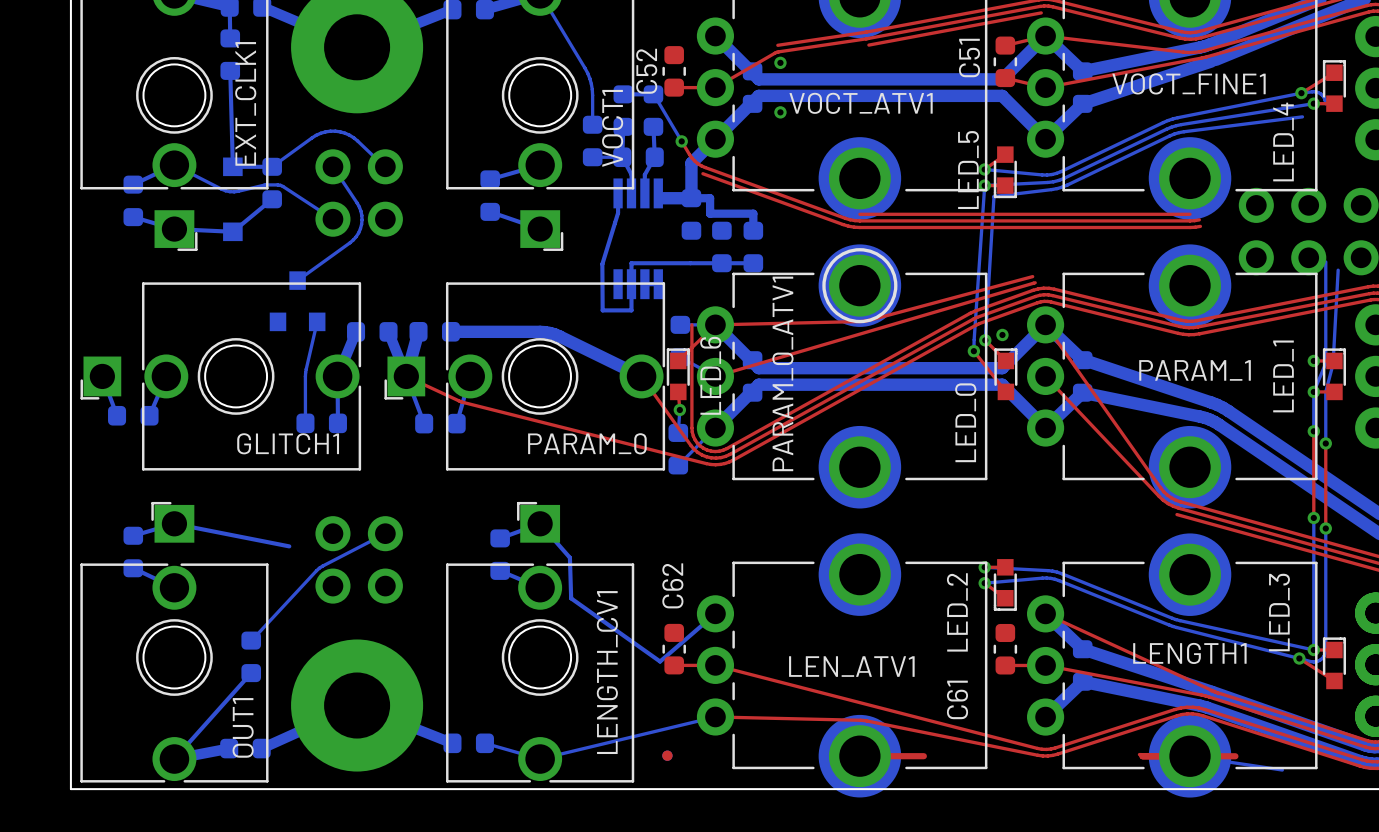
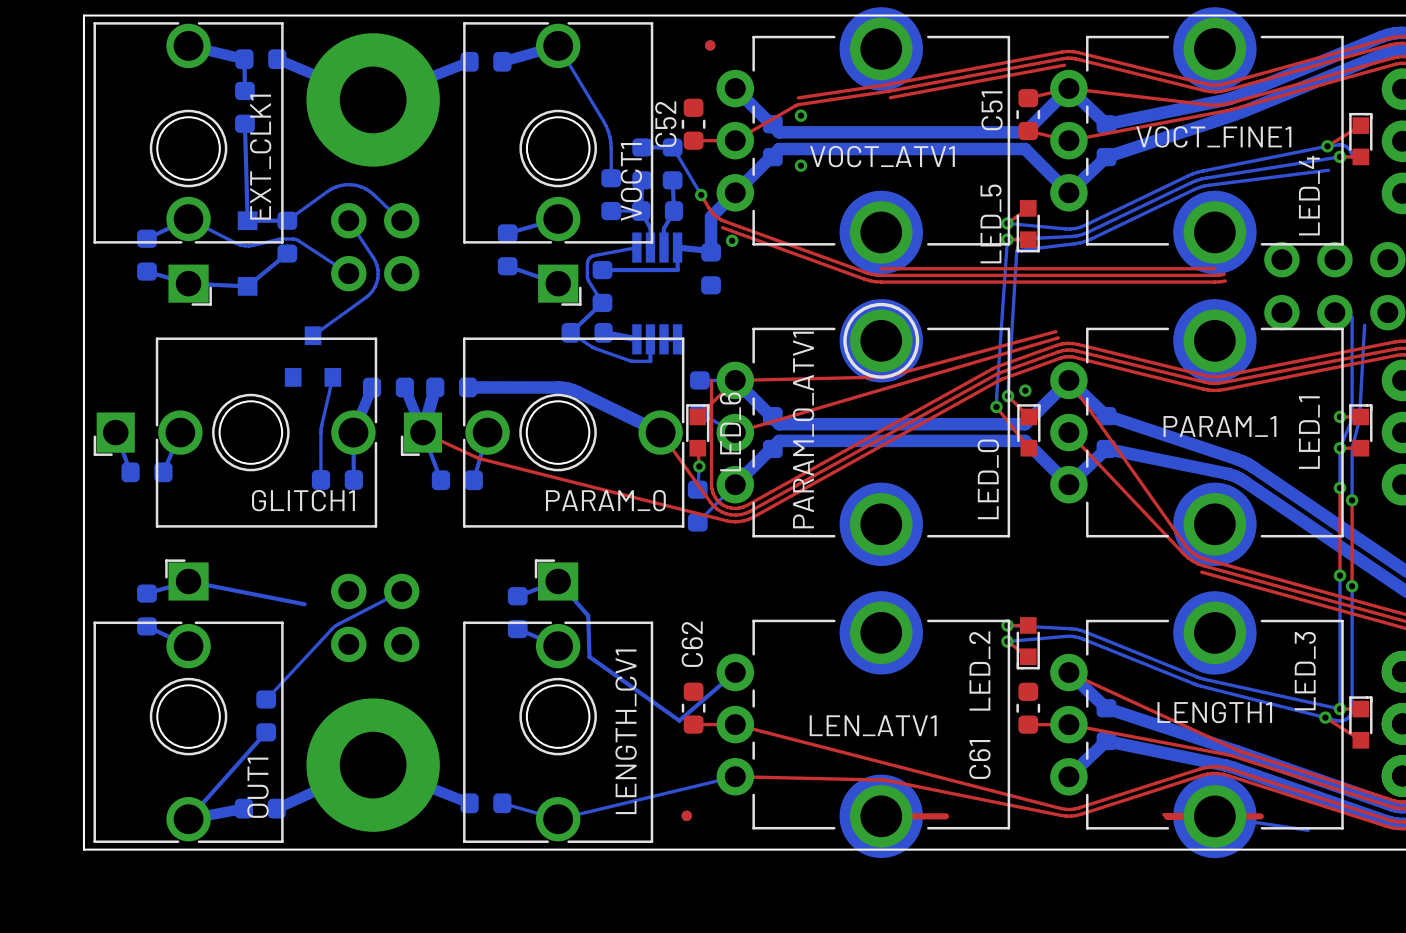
via: none -> (732, 240)
bottom track: (618, 193) (618, 213) (602, 264) (602, 310) (631, 310) (631, 305) -> (636, 247) (594, 255) (588, 259) (587, 278) (602, 302) (570, 332) (594, 348) (630, 360) (650, 361)
bottom track: none -> (711, 251) (677, 247) (677, 270) (602, 270)
bottom track: (661, 198) (710, 198) (710, 213) (753, 213) (753, 230) -> none
part: none -> (602, 286)
part: (721, 246) -> none
part: (753, 246) -> none
bottom track: (753, 263) (631, 263) (631, 284) -> none
part: none -> (587, 332)
bottom track: none -> (603, 332) (636, 339)

